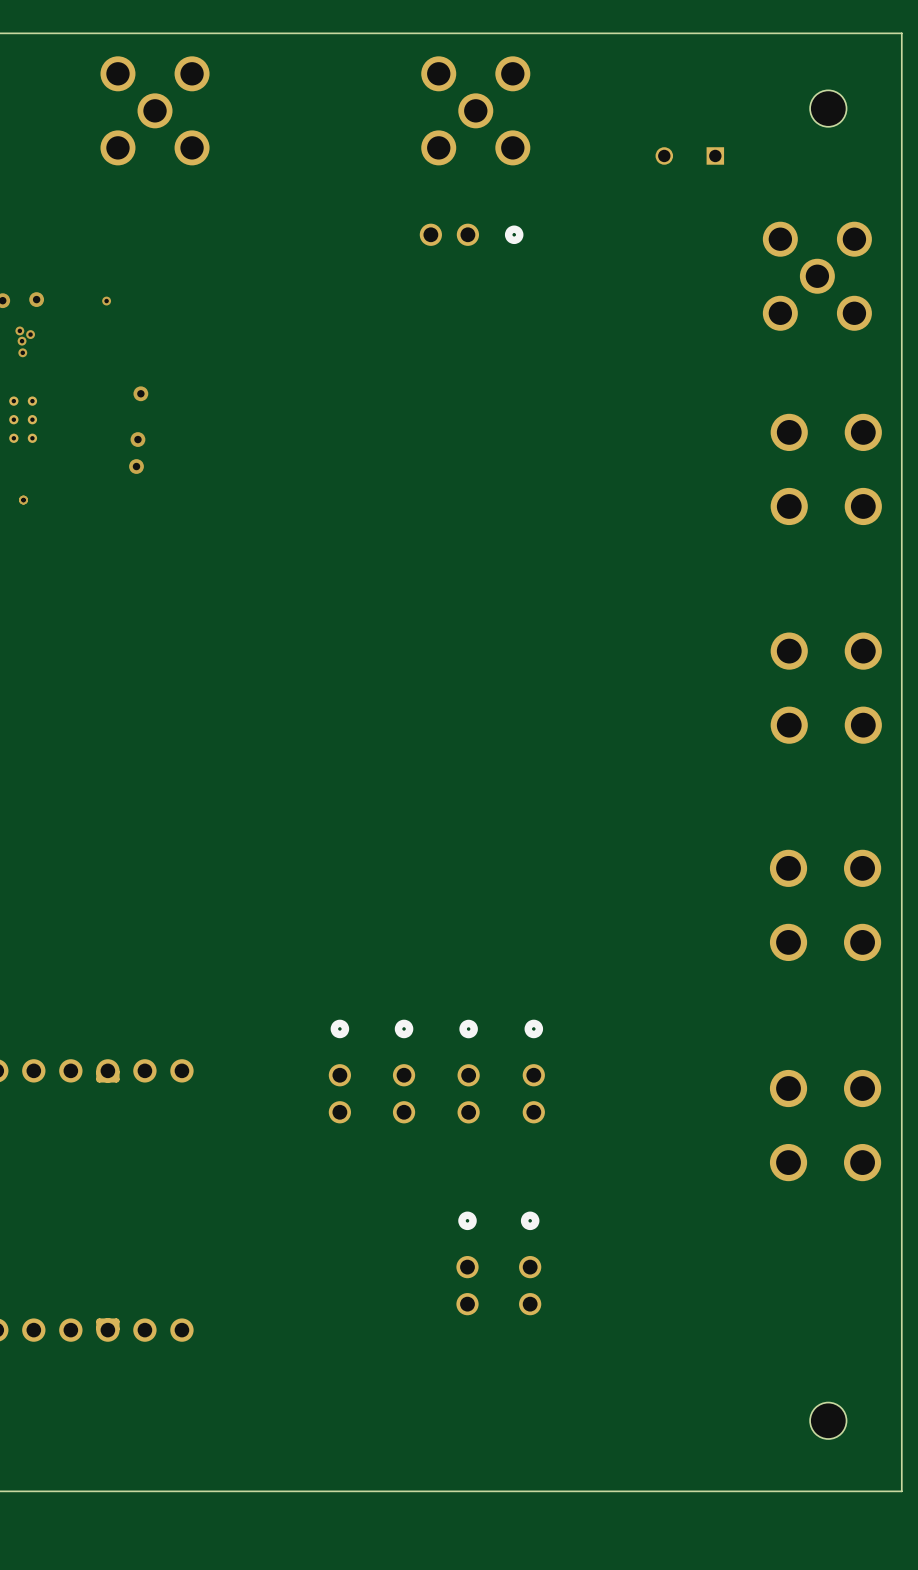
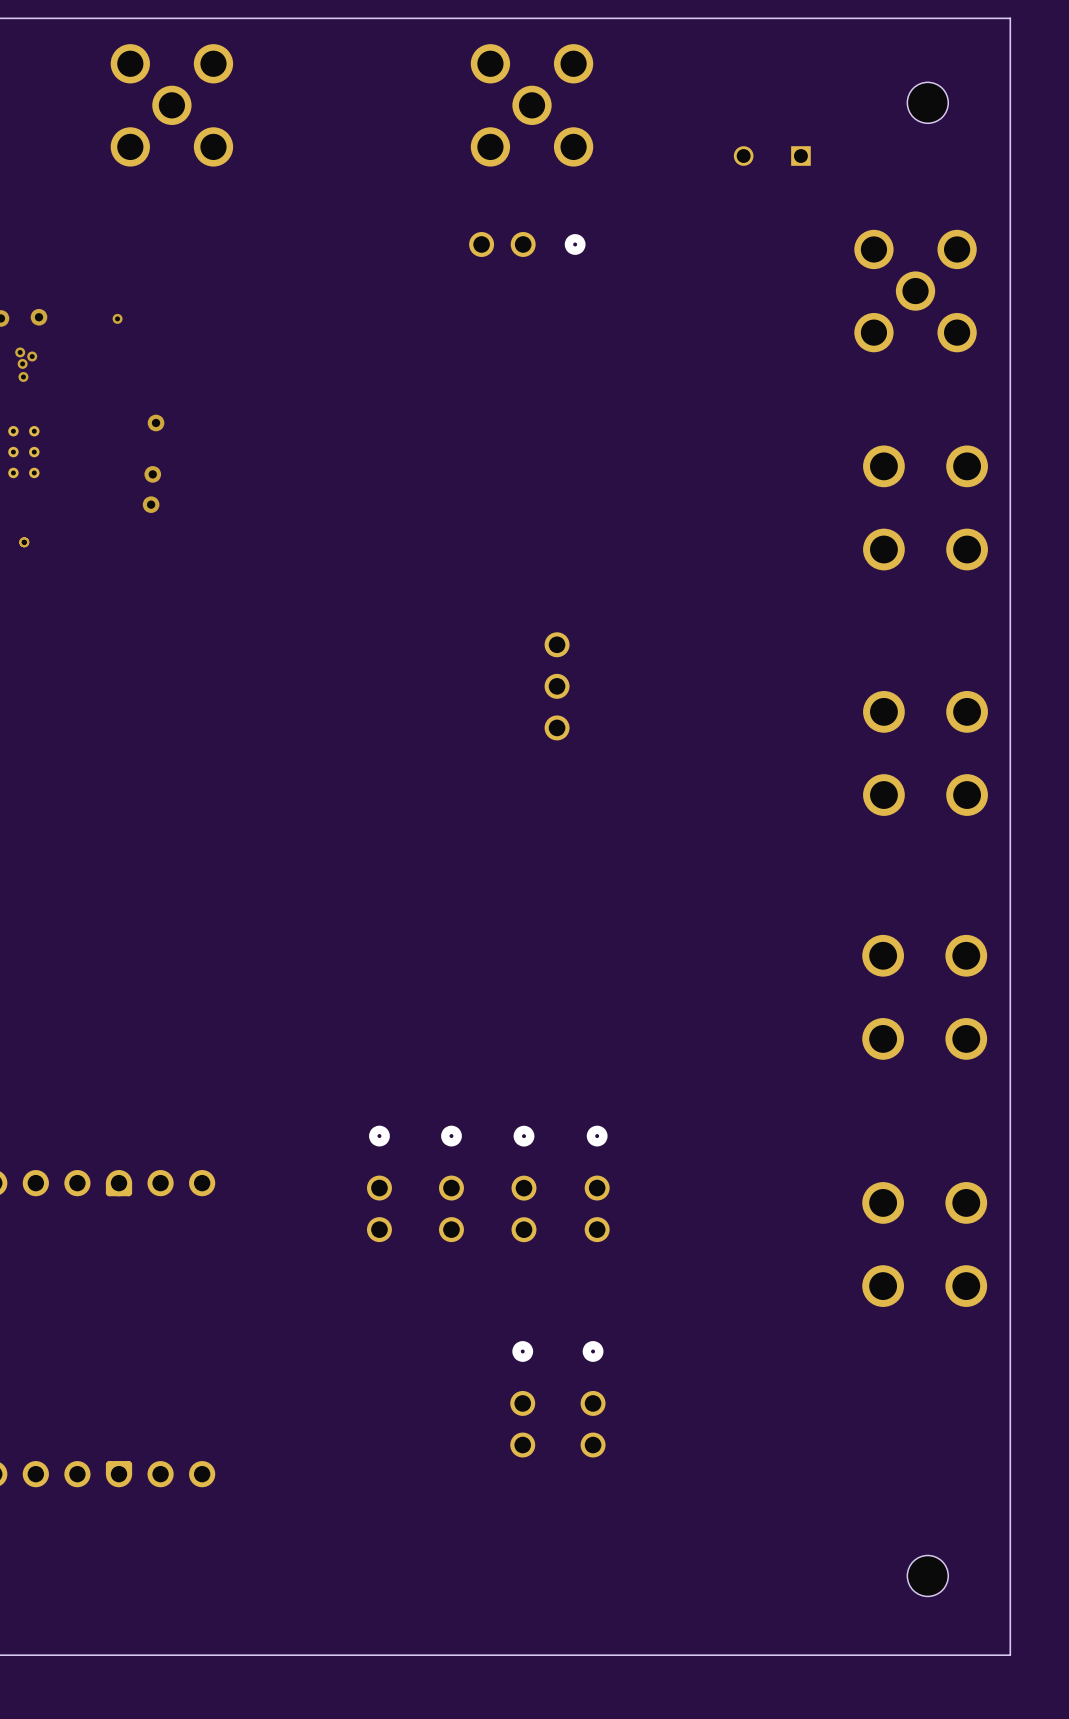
part: none -> (557, 686)

